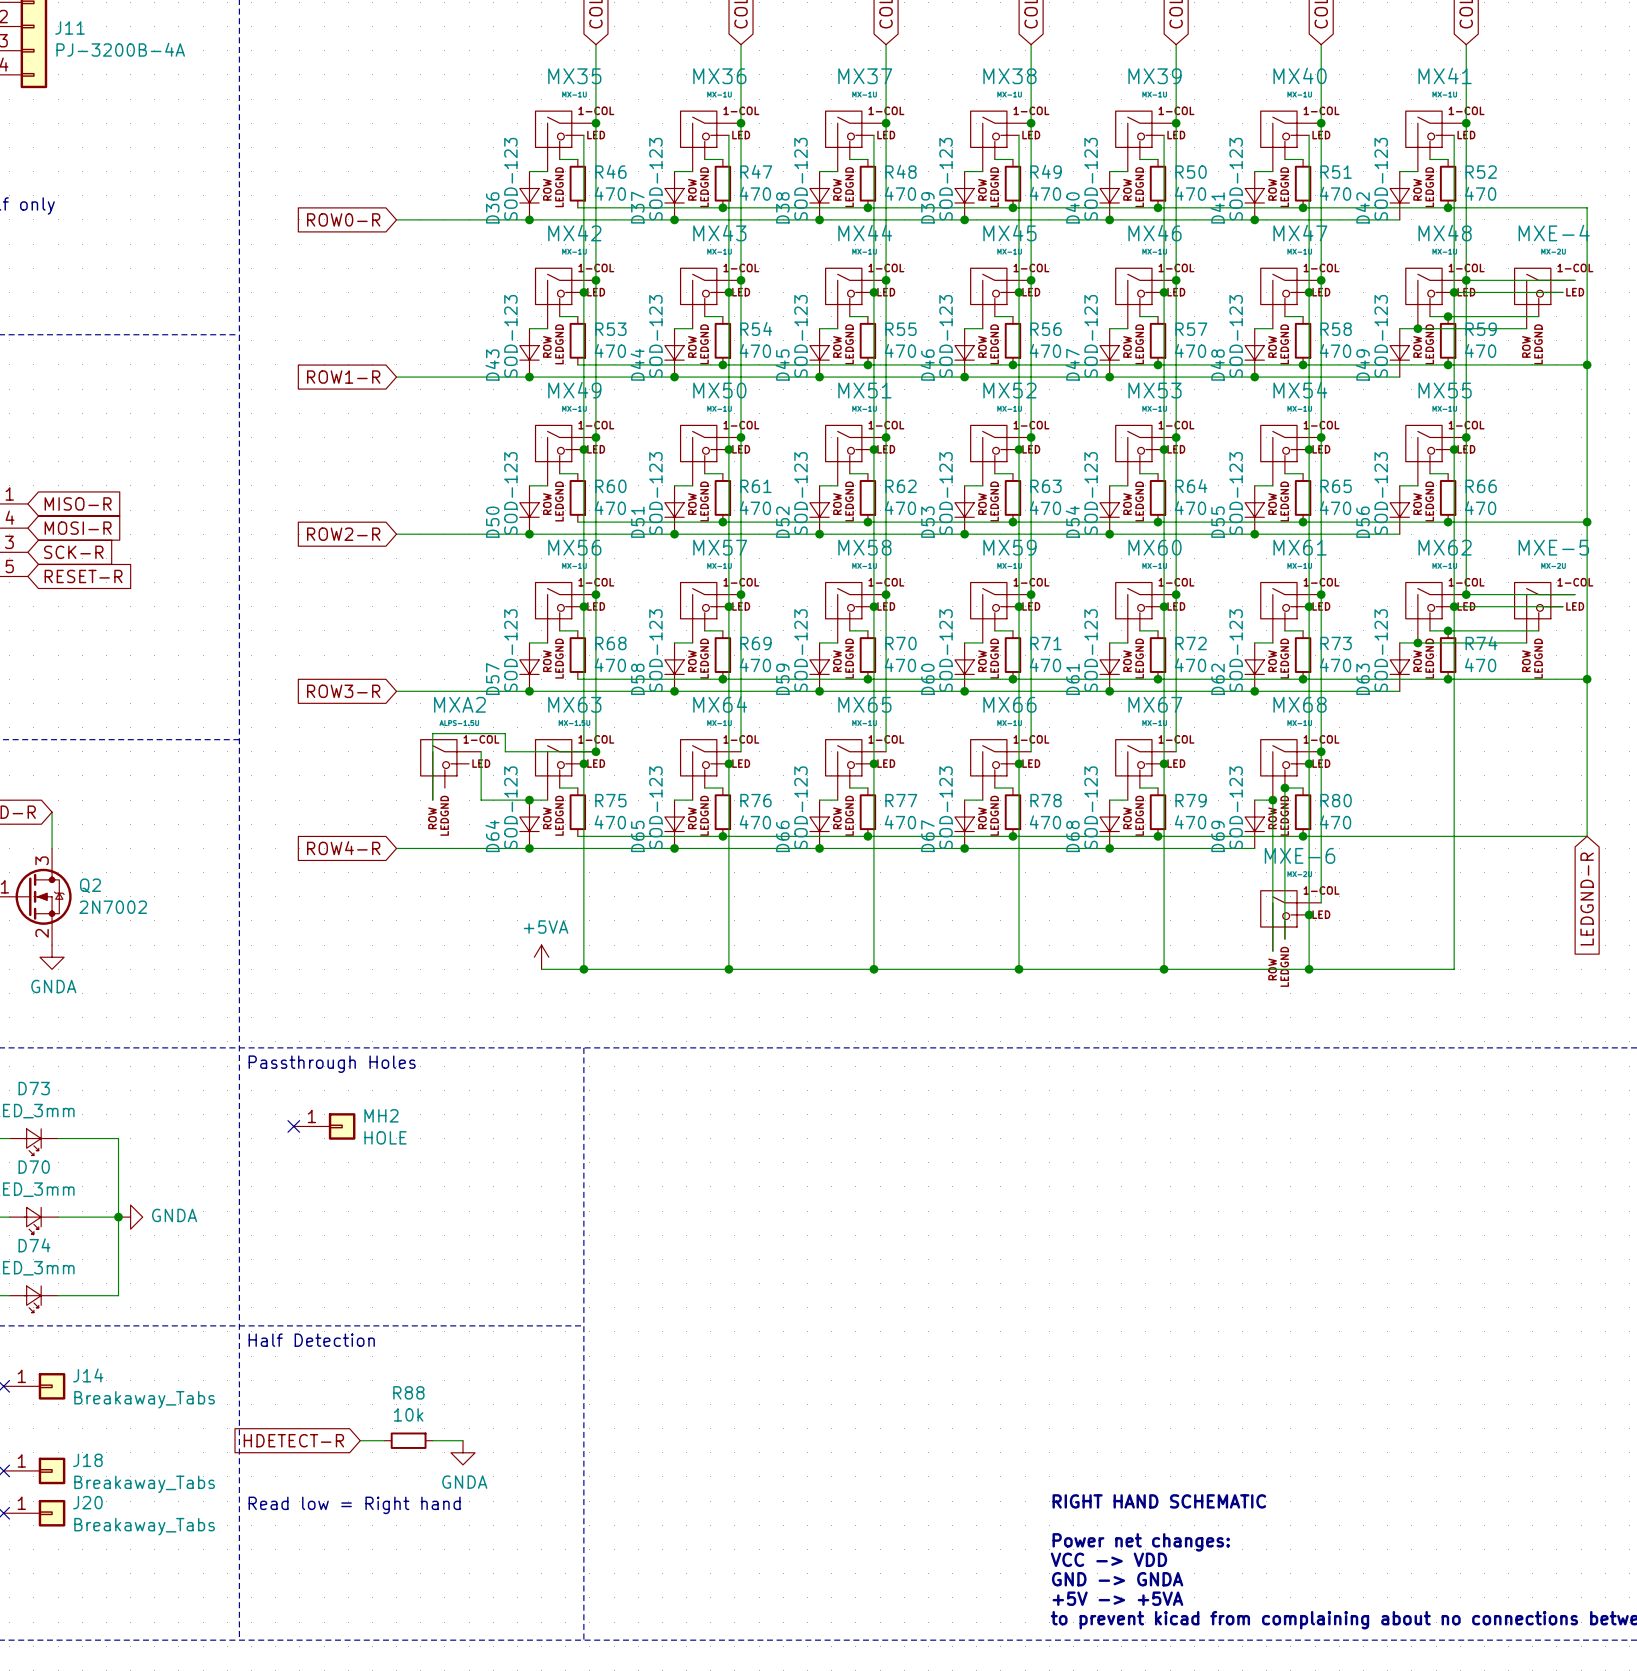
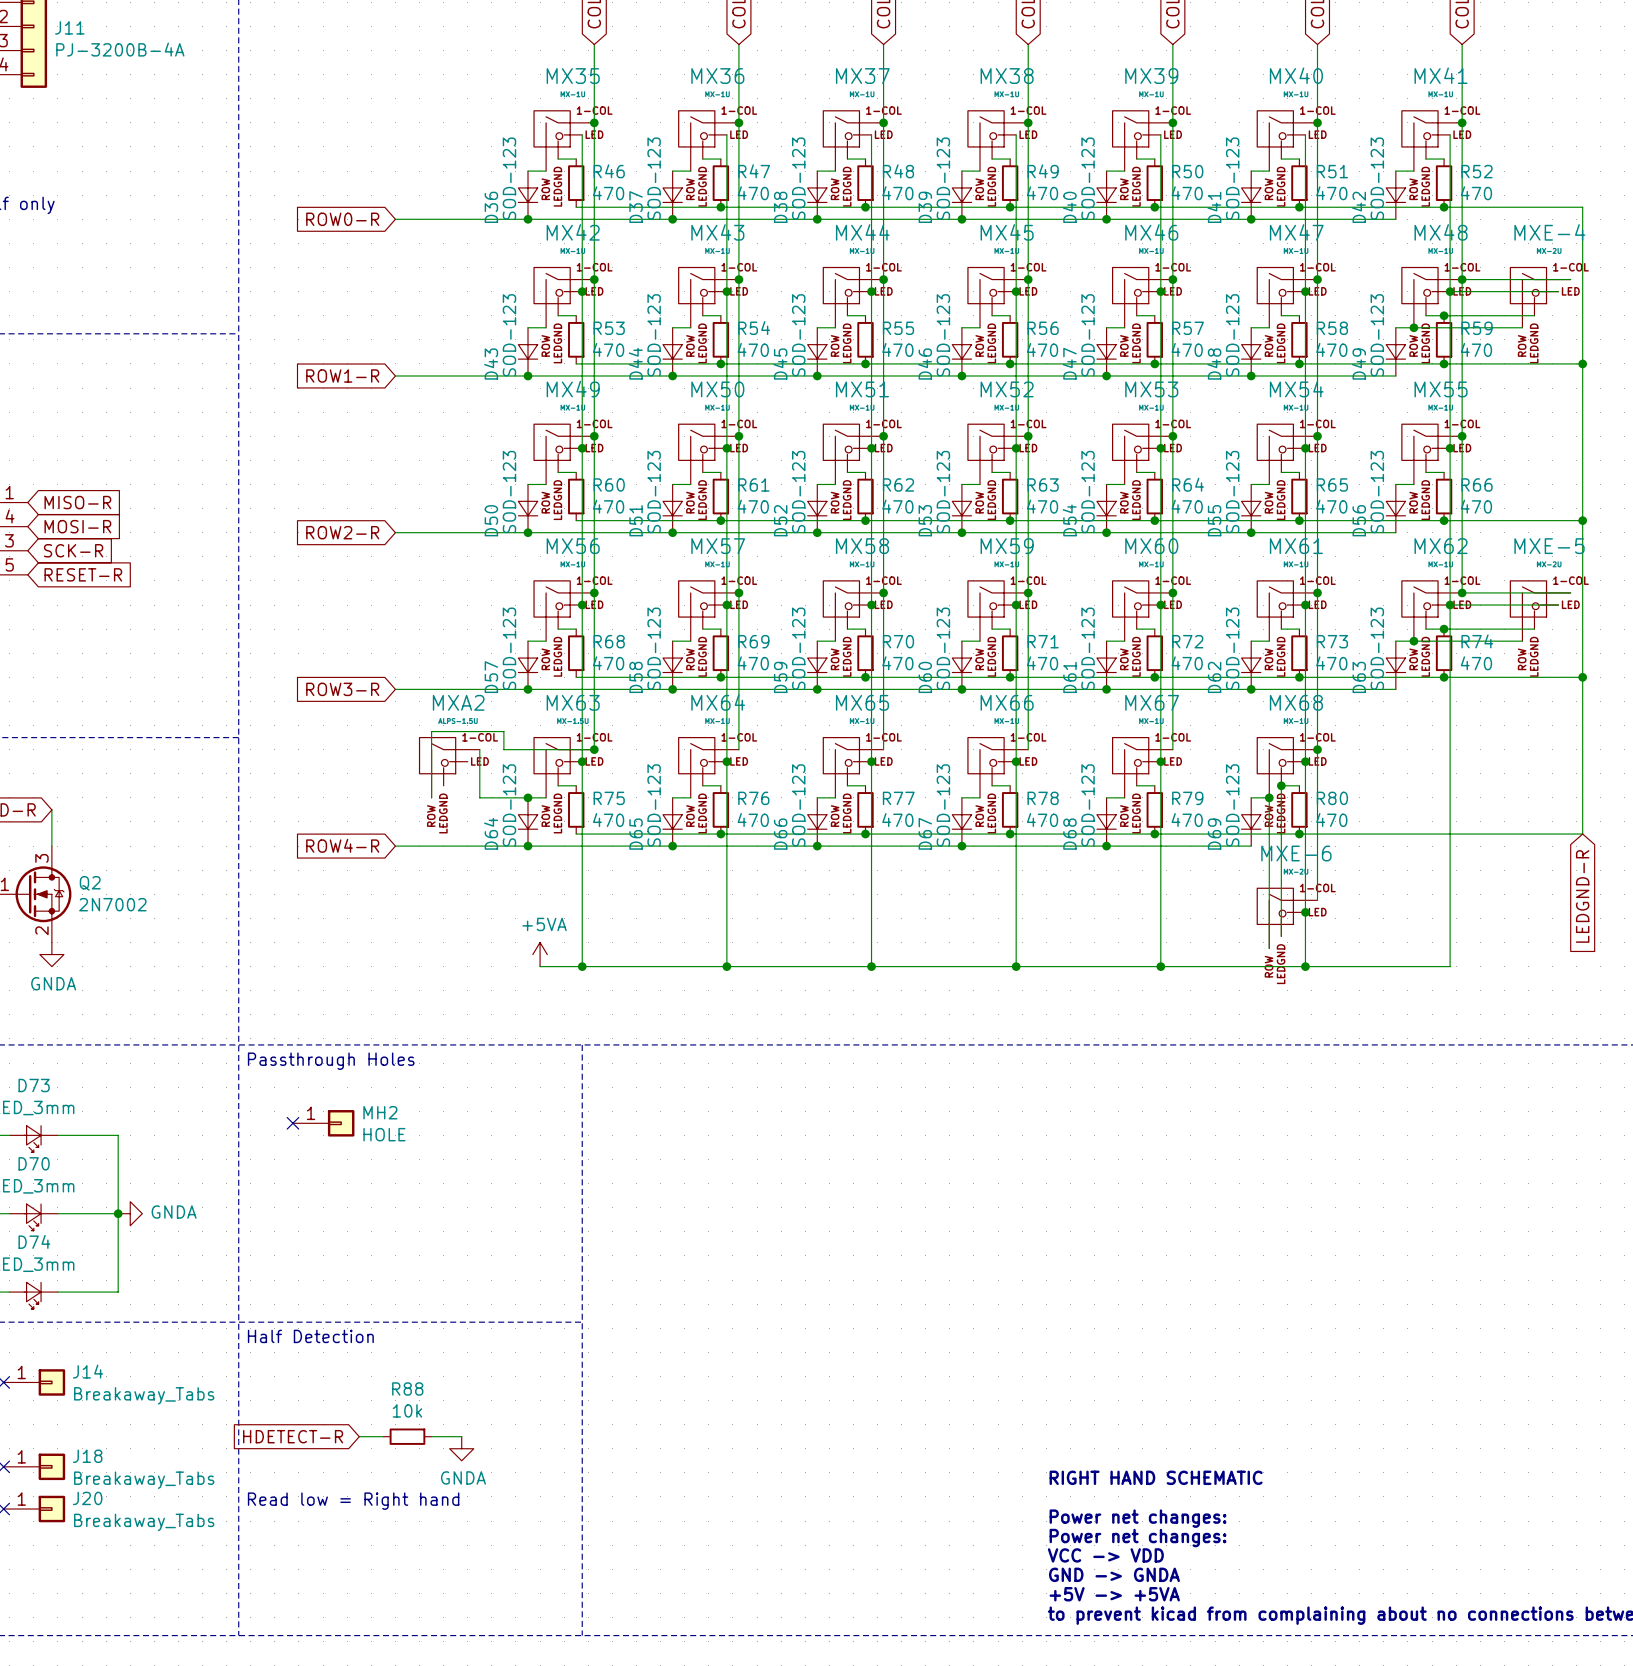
text position: RIGHT HAND SCHEMATIC (1159, 1501) -> RIGHT HAND SCHEMATIC (1156, 1477)
text: none -> Power net changes: (1138, 1518)

